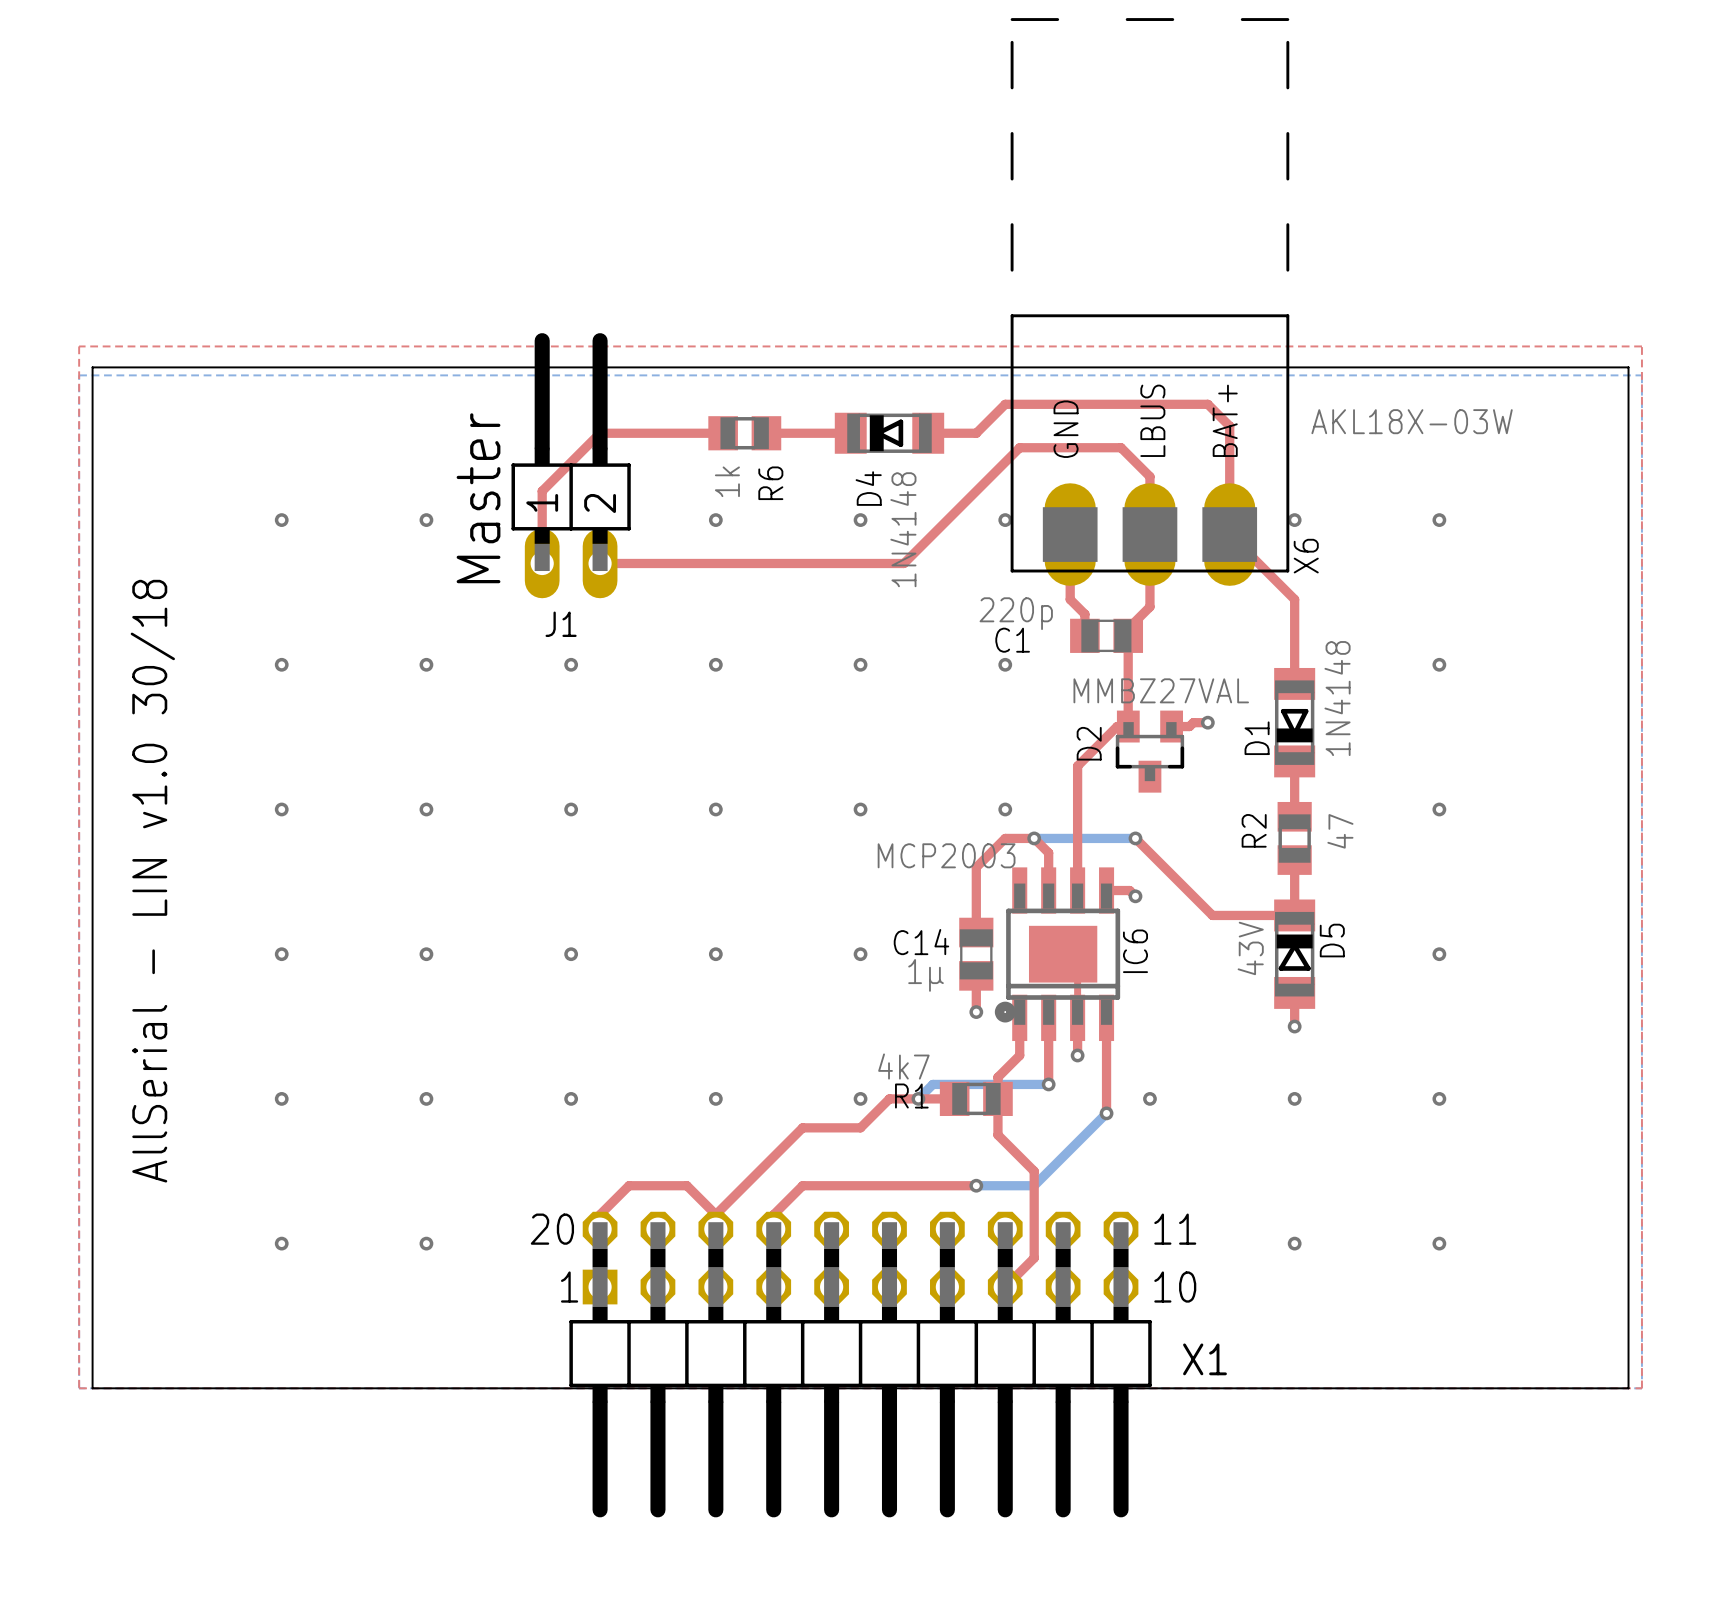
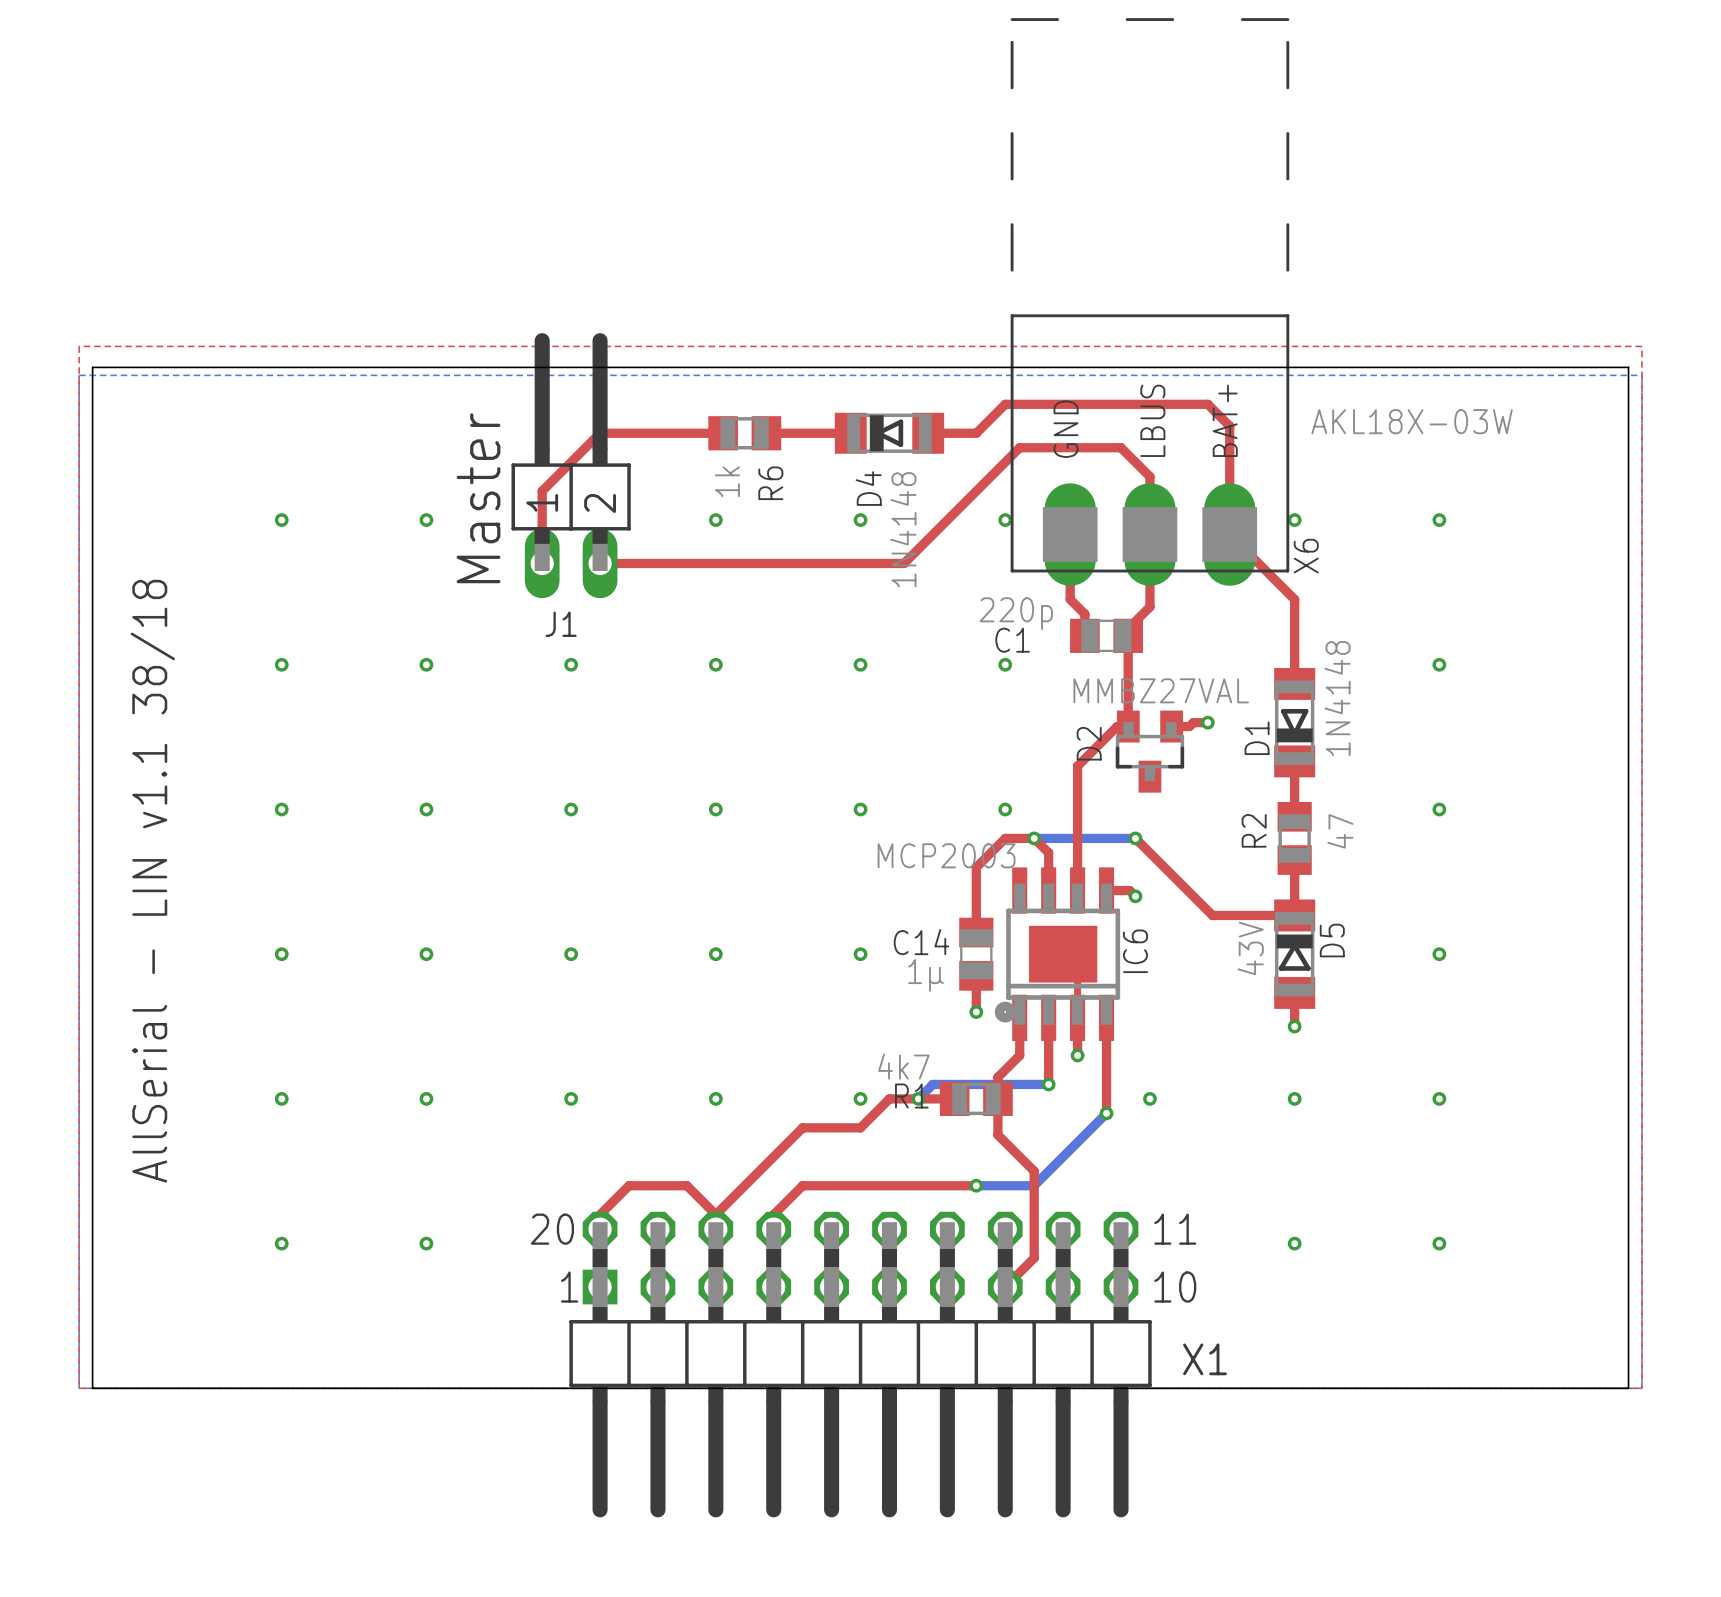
text: AllSerial - LIN v1.0 30/18 (152, 881) -> AllSerial - LIN v1.1 38/18 (152, 881)

